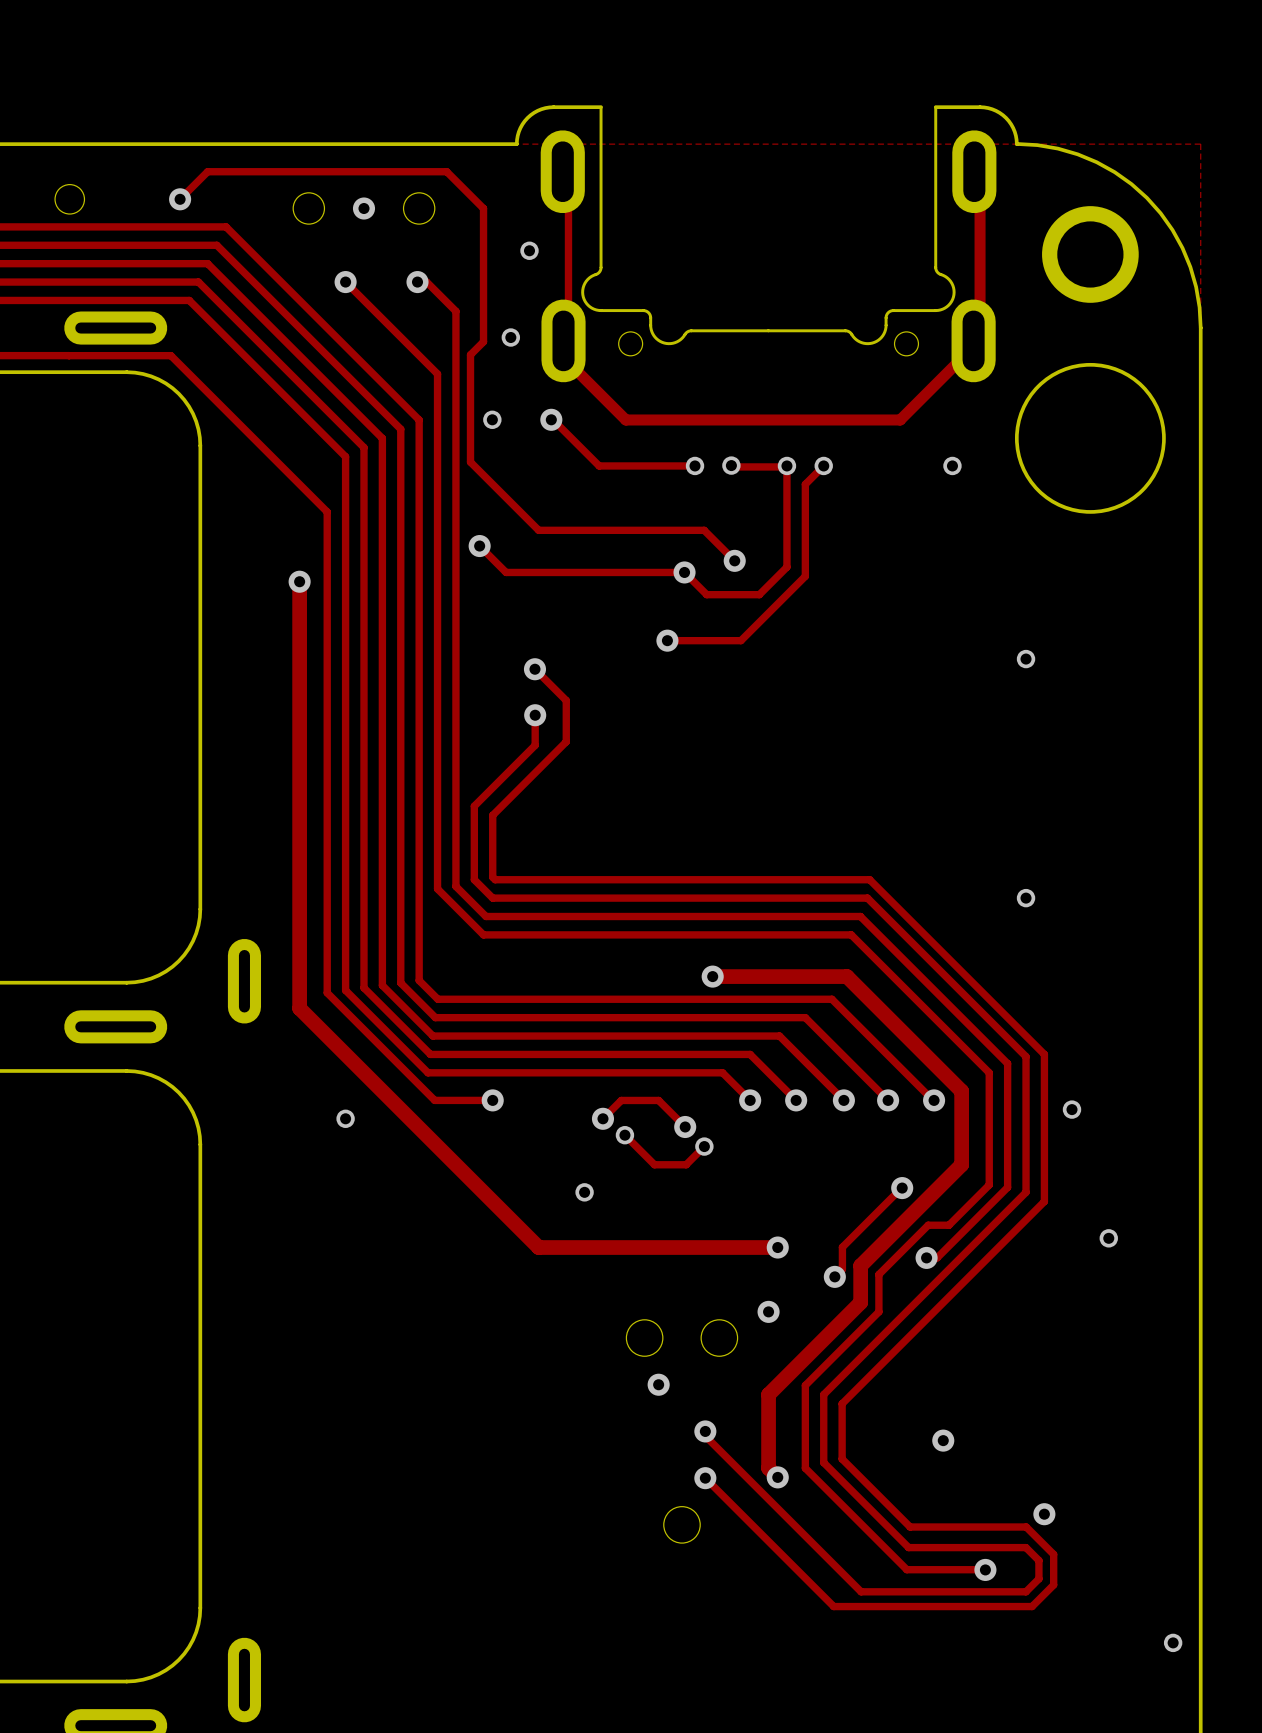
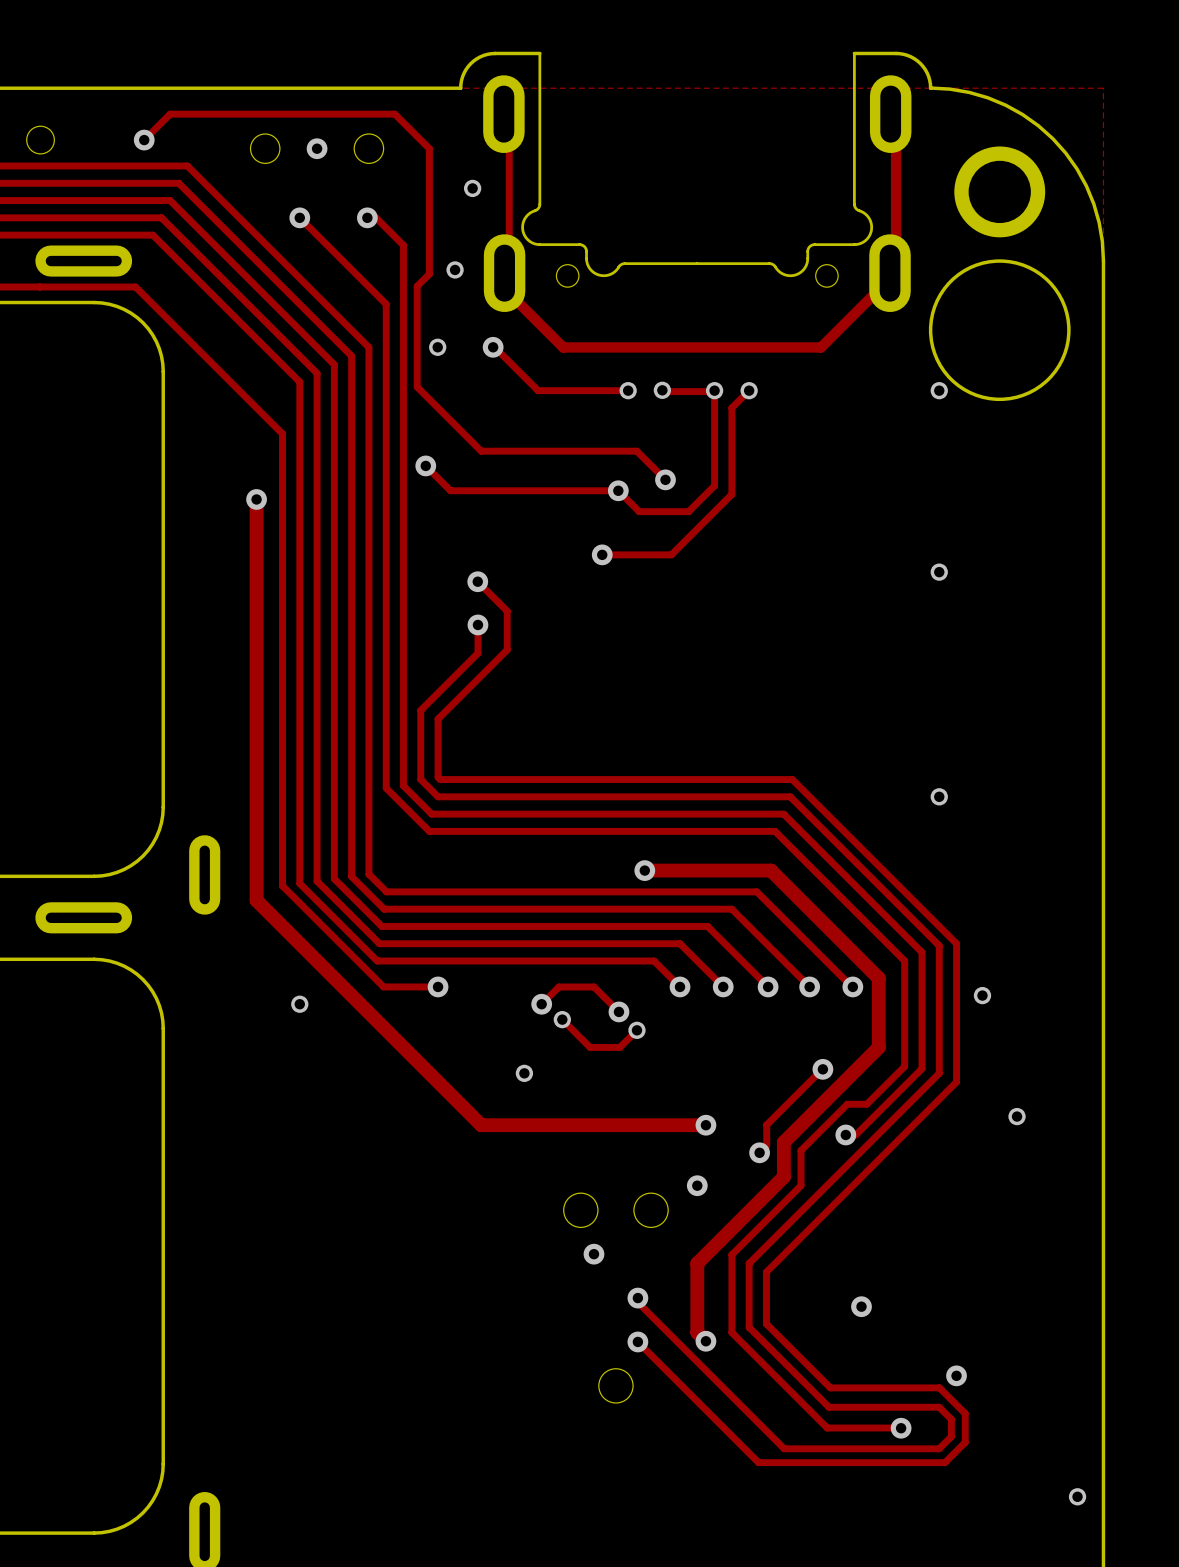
round board edge position: (1090, 438) -> (999, 330)
via position: (952, 465) -> (939, 390)

